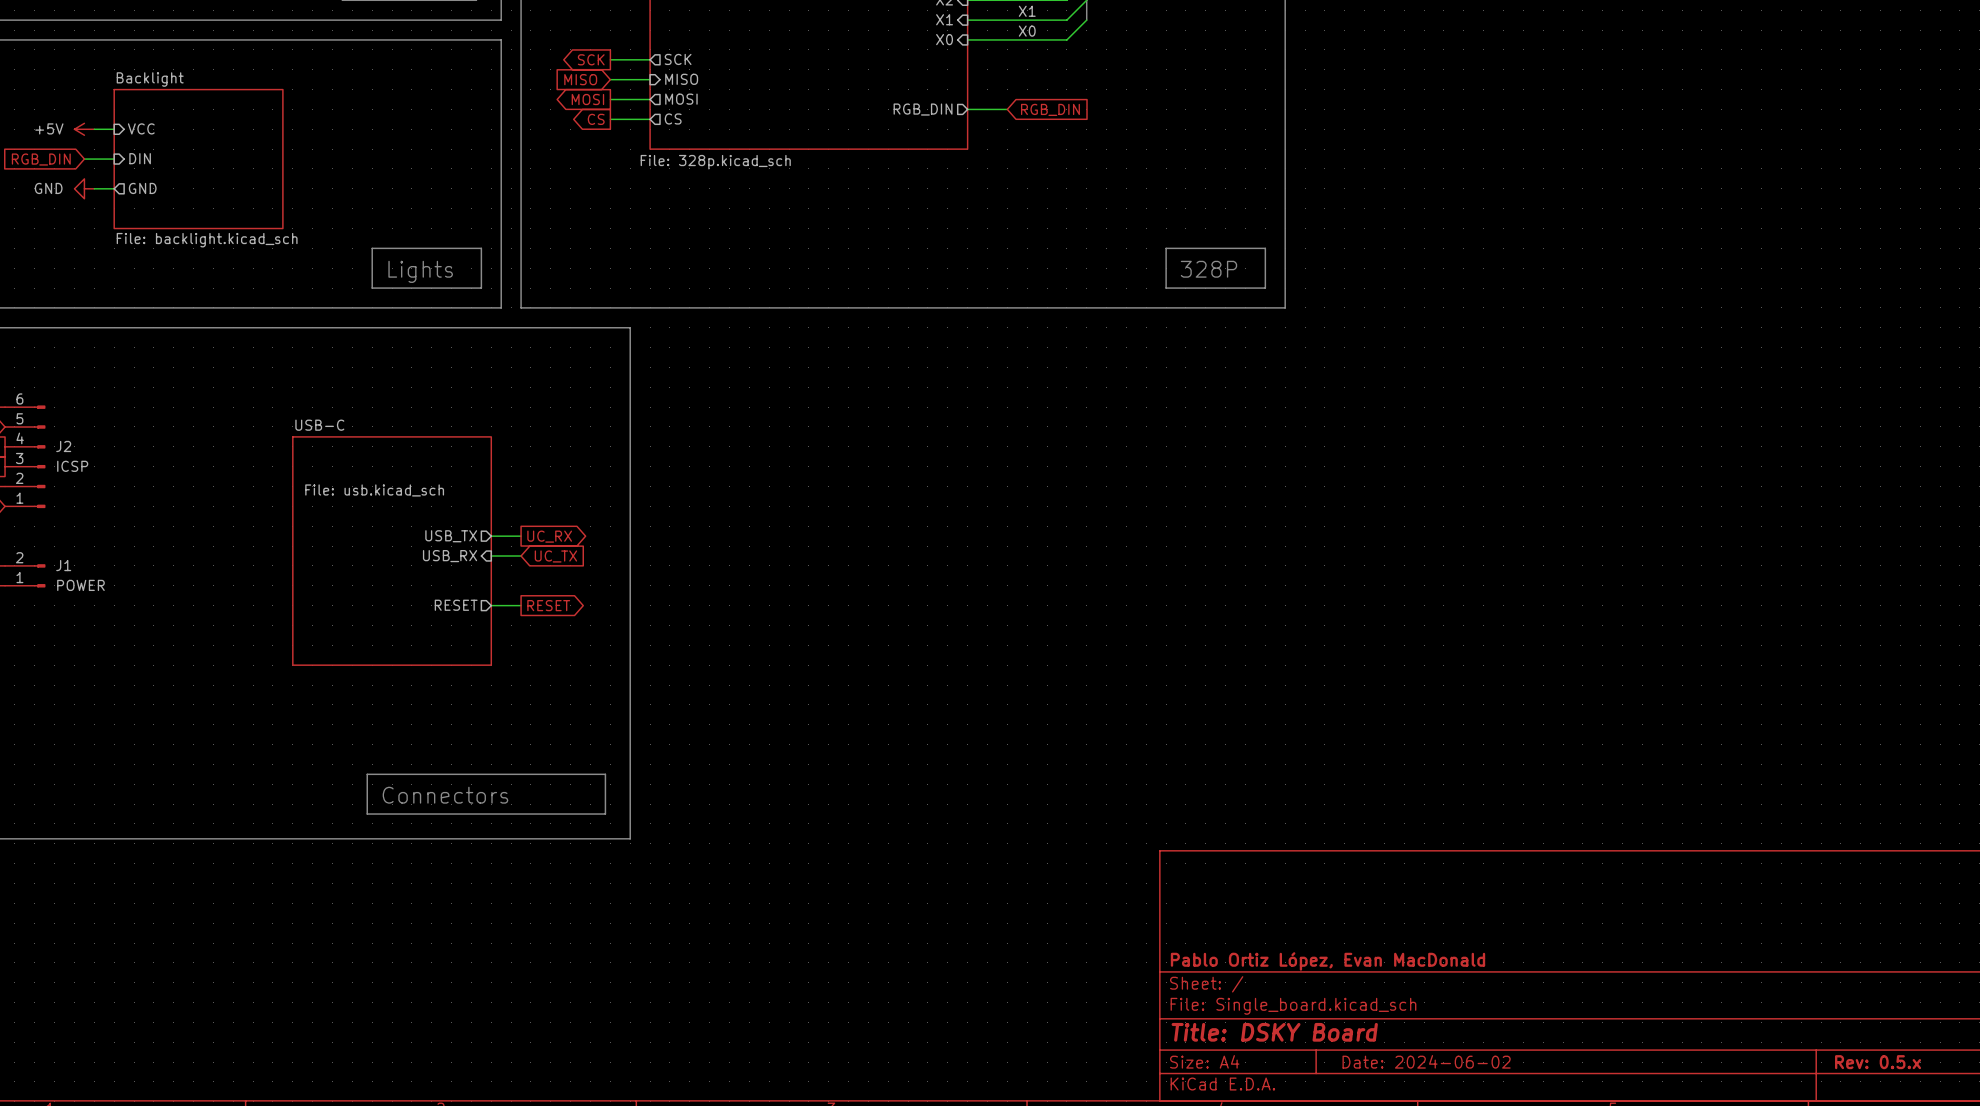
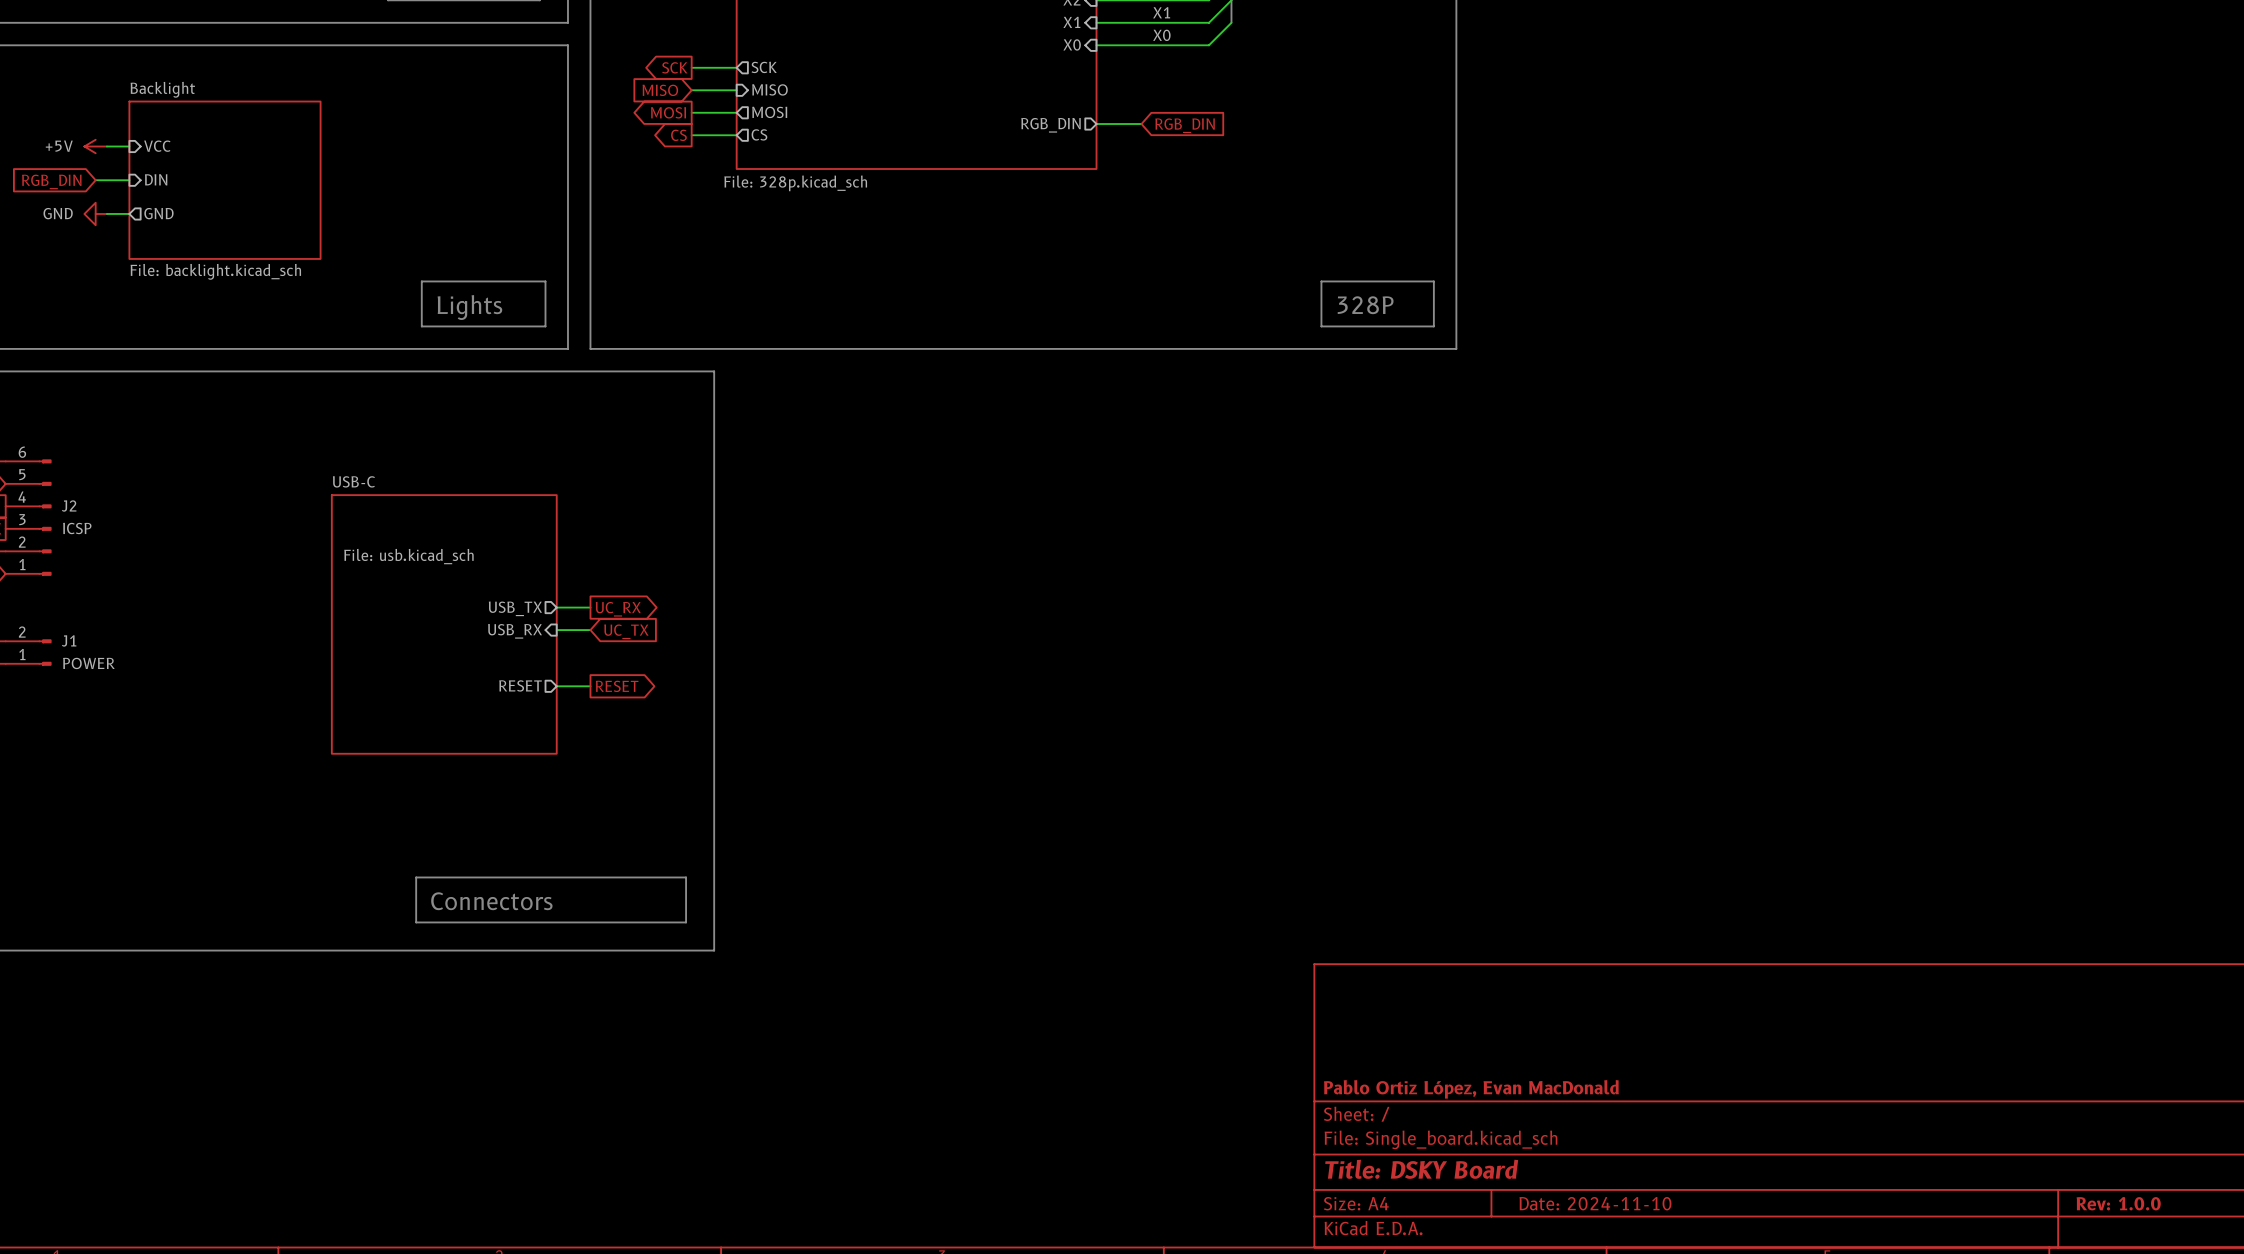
title block: Date: 2024-06-02 (1426, 1061) -> Date: 2024-11-10 (1595, 1203)
title block: Rev: 0.5.x (1878, 1062) -> Rev: 1.0.0 (2118, 1203)

